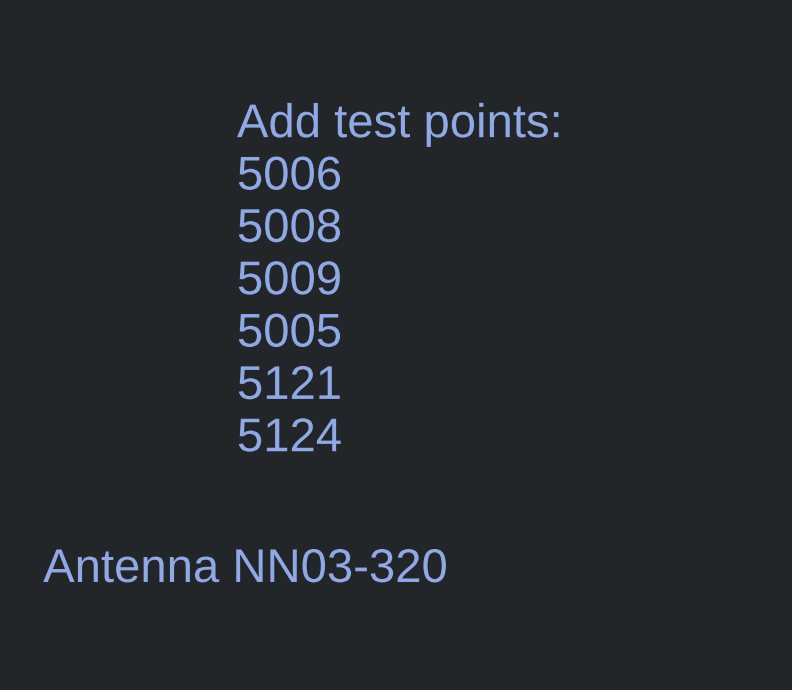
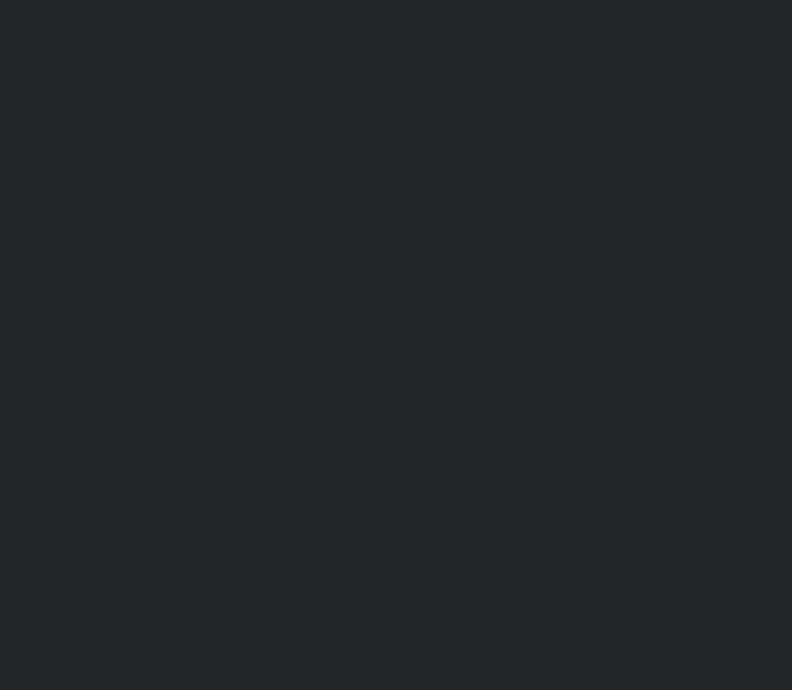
text: Add test points: (397, 124) -> none
text: 5006 (289, 173) -> none
text: 5008 (289, 225) -> none
text: 5009 (289, 277) -> none
text: 5005 (289, 330) -> none
text: 5121 (289, 382) -> none
text: 5124 (289, 434) -> none
text: Antenna NN03-320 (244, 565) -> none

